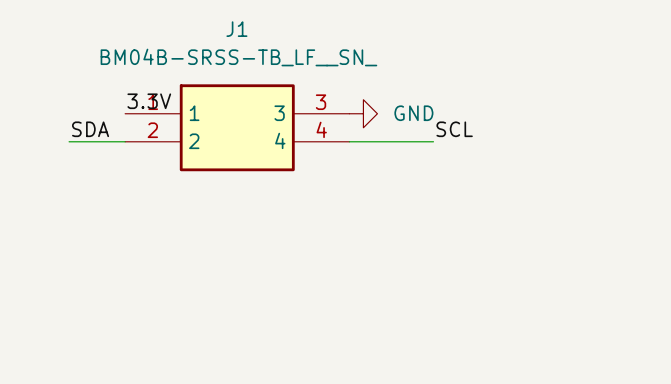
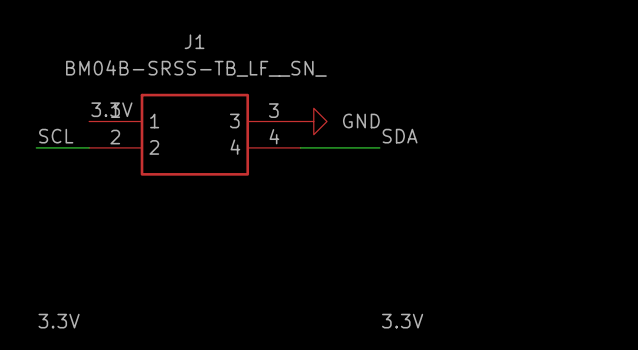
label: SDA (90, 129) -> SCL (56, 136)
label: SCL (454, 129) -> SDA (400, 136)
label: none -> 3.3V (59, 321)
label: none -> 3.3V (402, 321)

